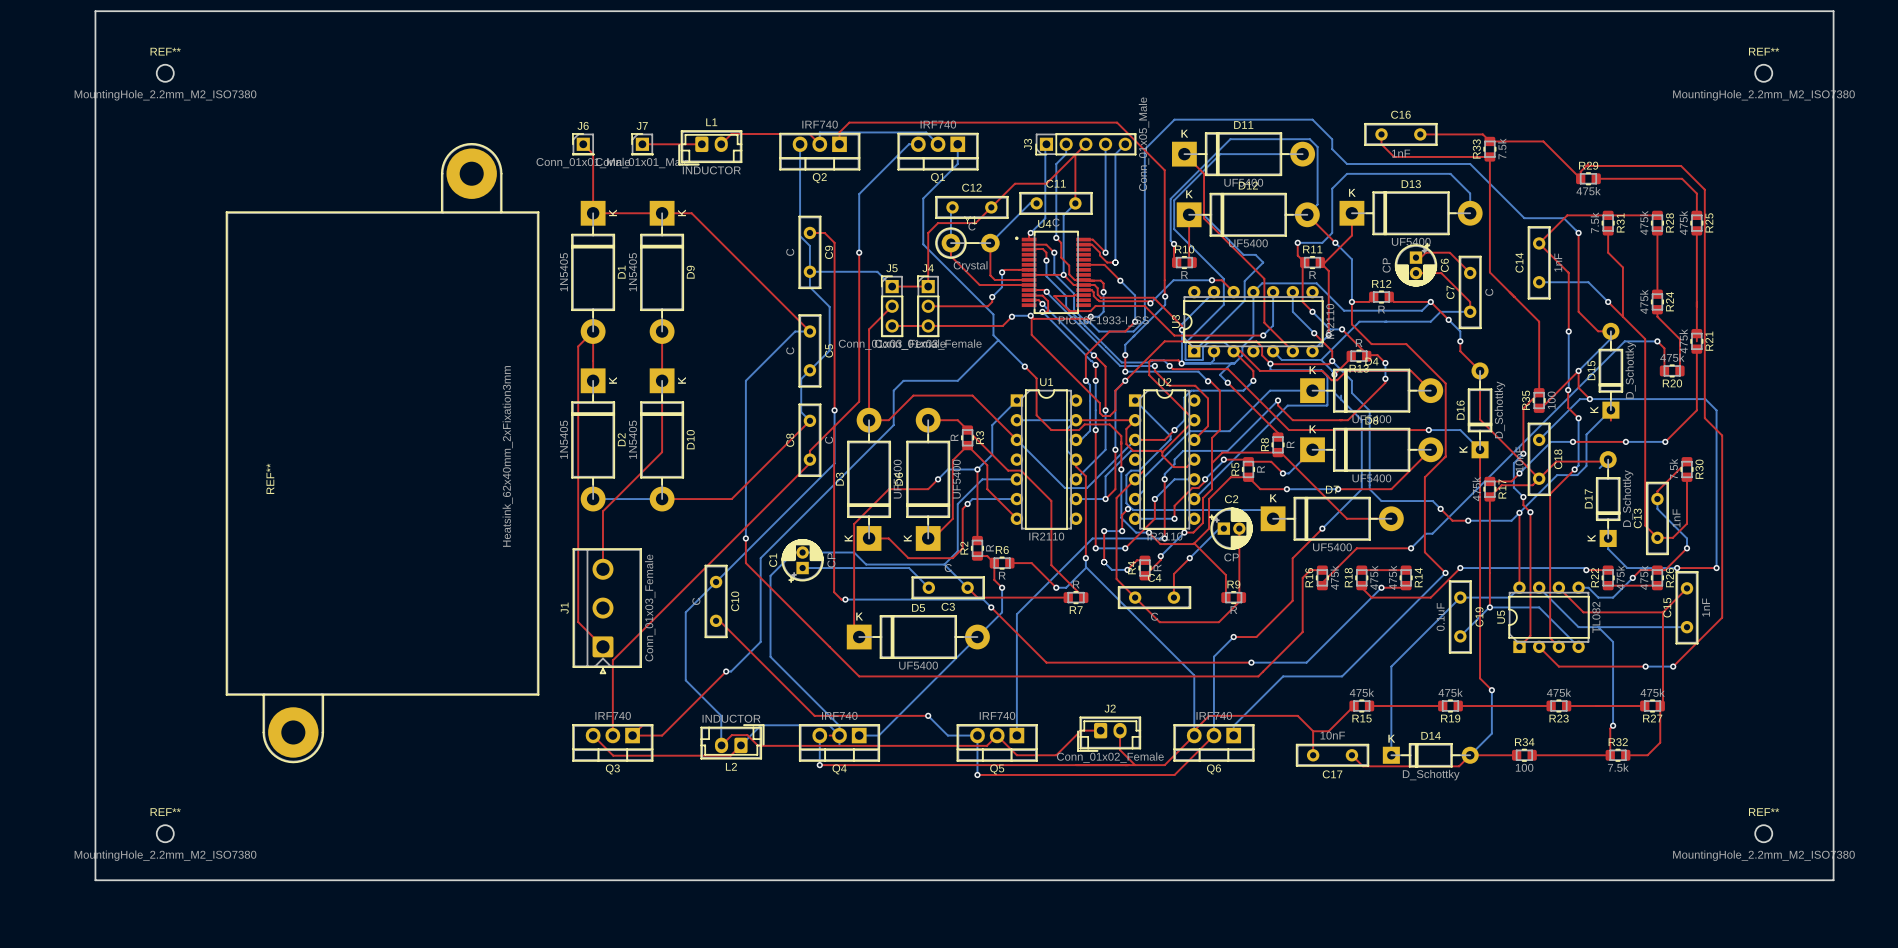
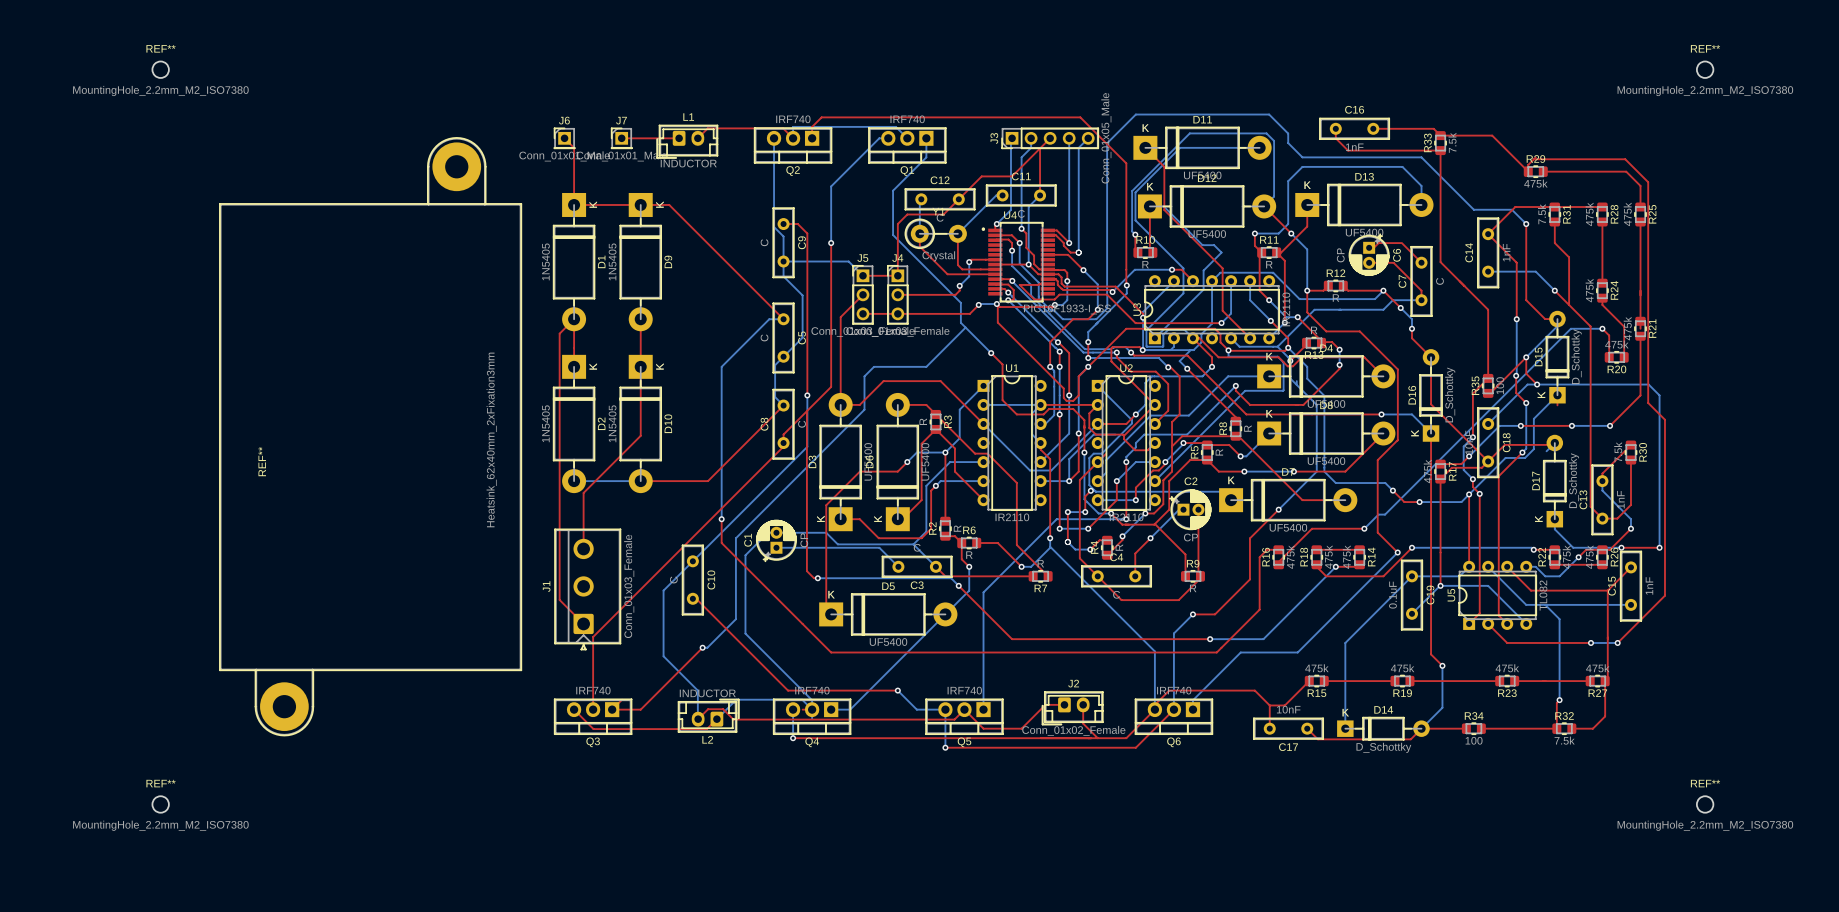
board edge: (95, 11) (95, 880) (1833, 880) (1833, 11) (95, 11) -> none

